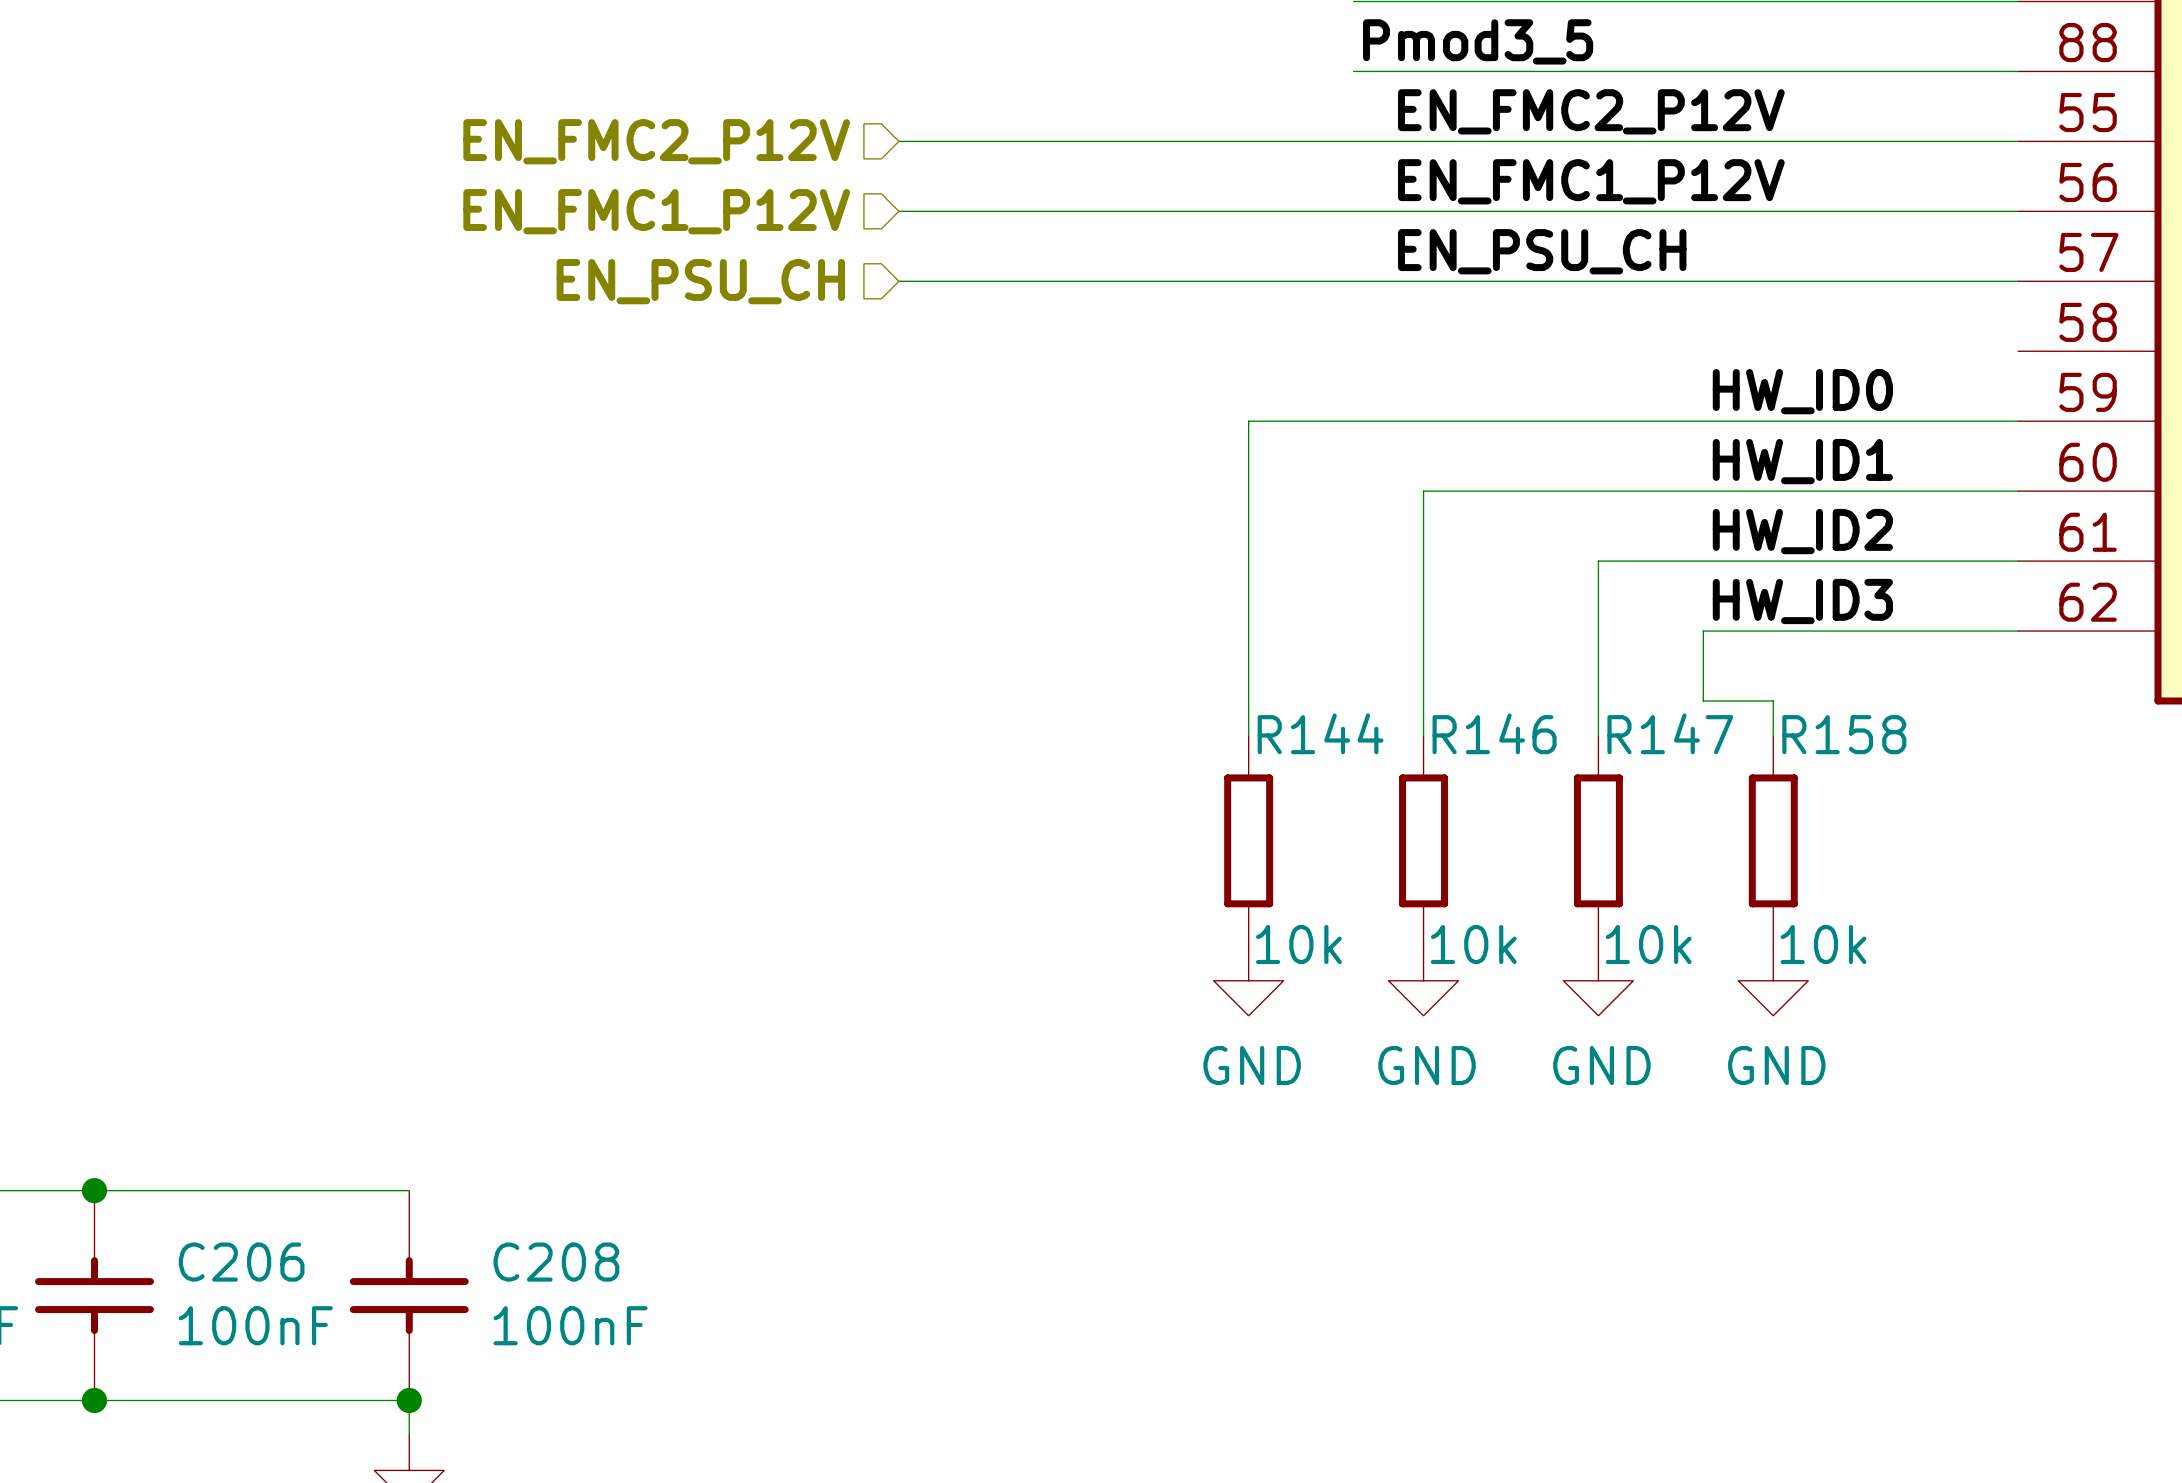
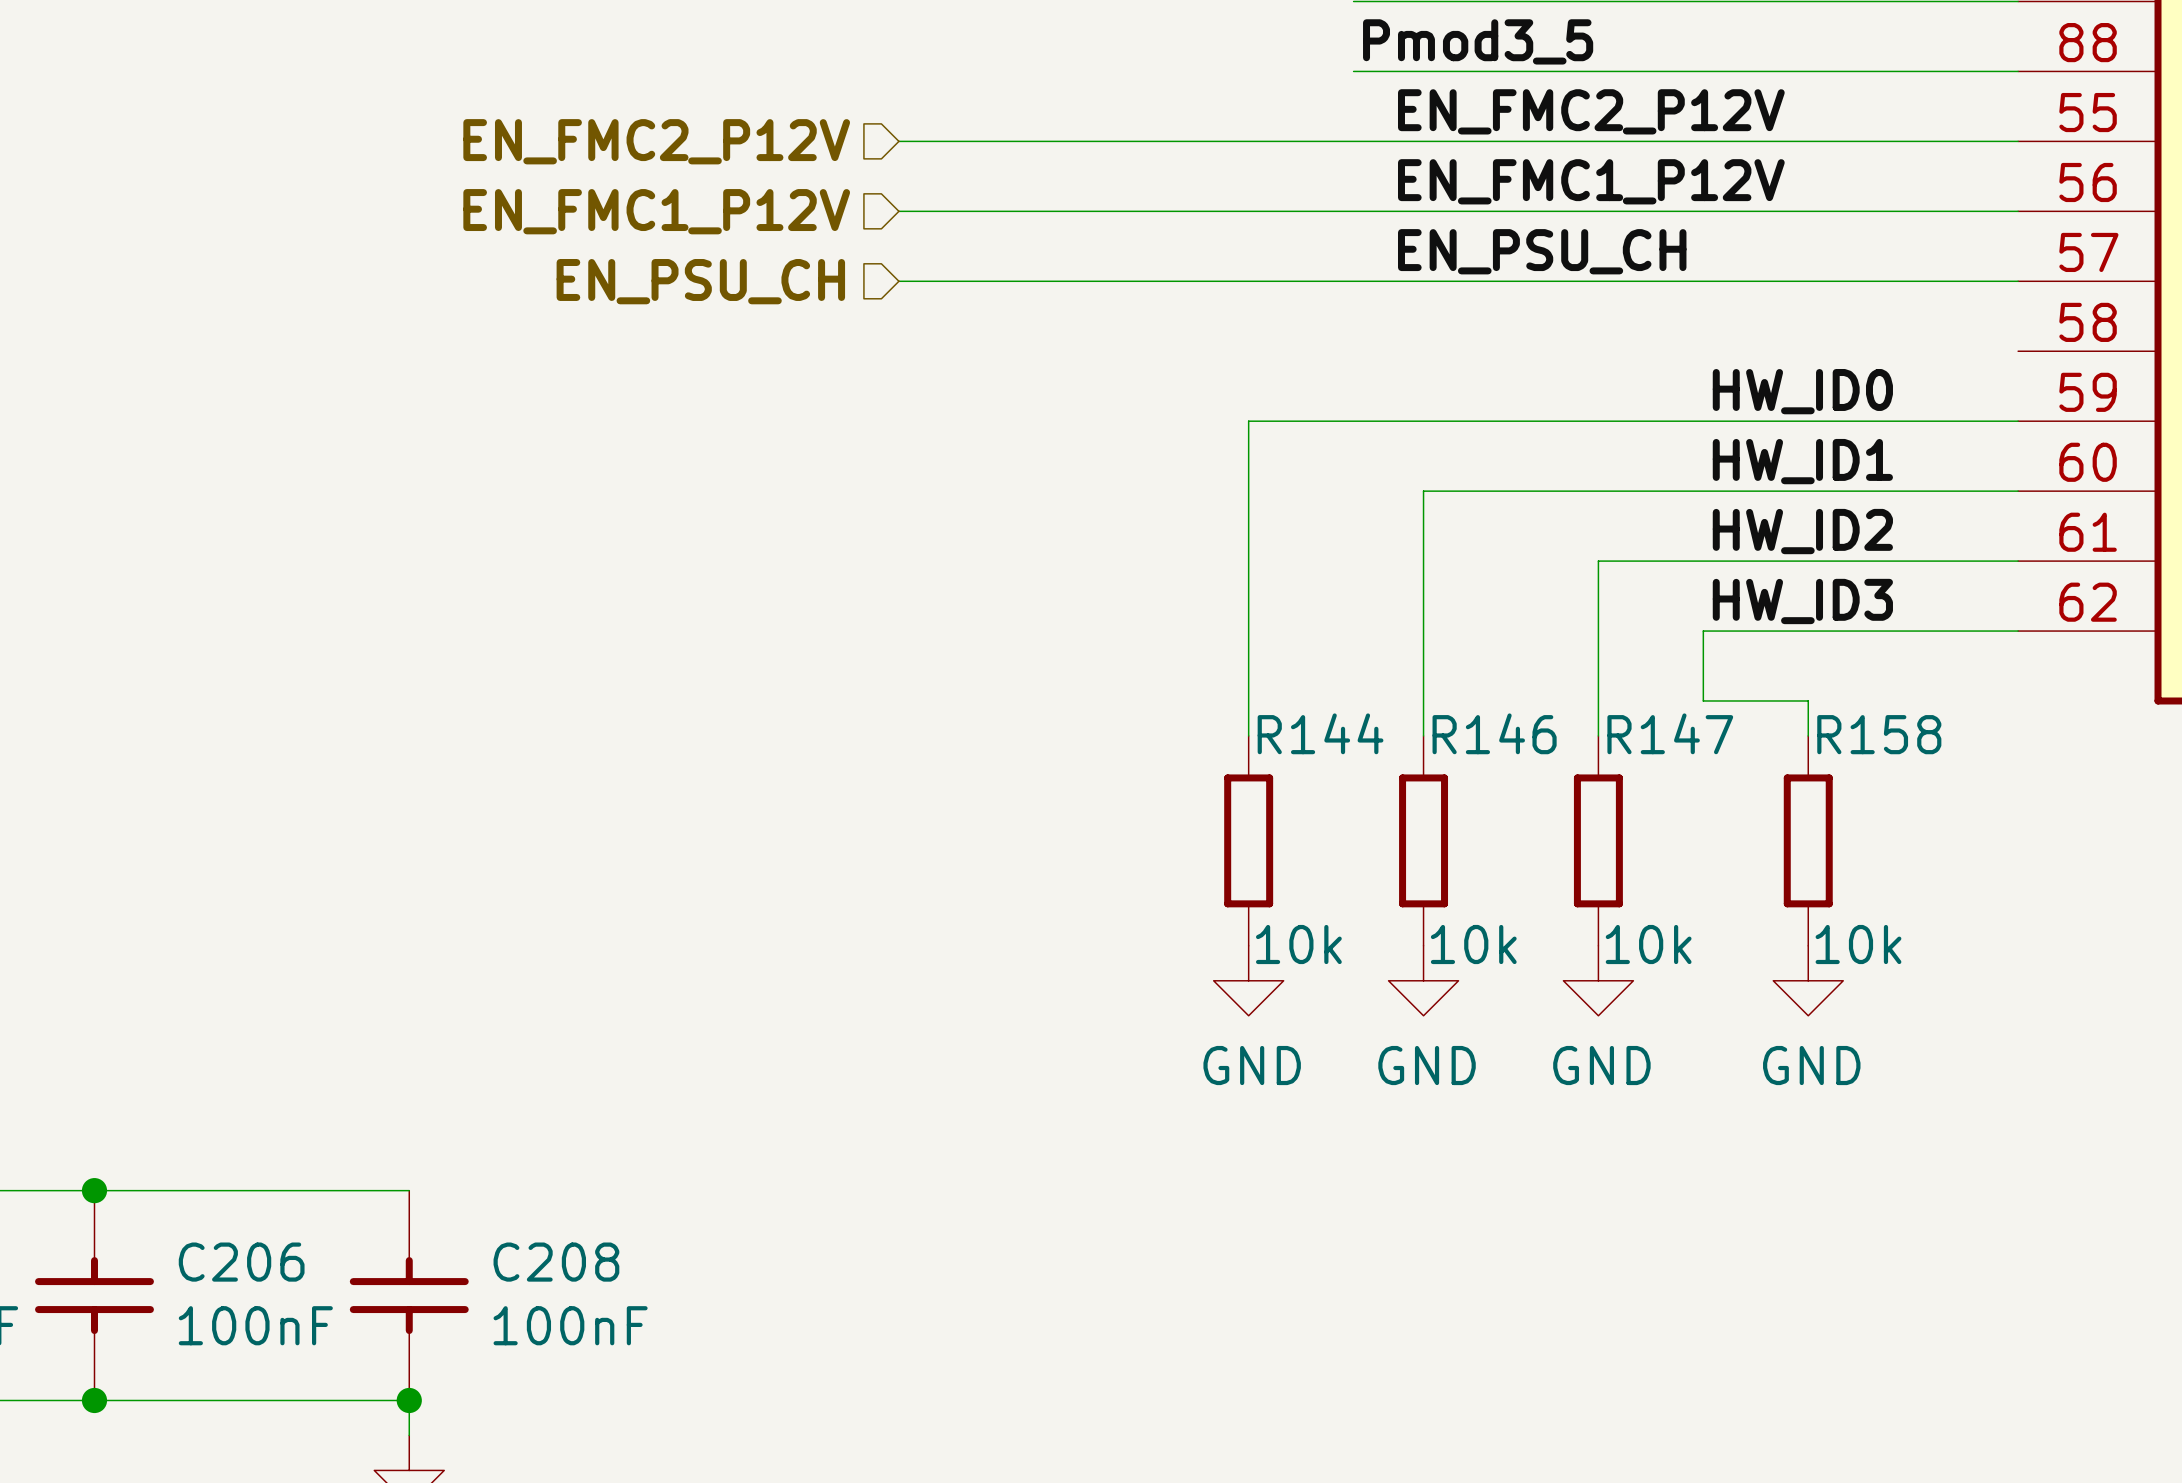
wire: (1773, 700) (1773, 735) -> (1773, 700) (1808, 700) (1808, 735)
R158 position: (1773, 840) -> (1808, 840)
power symbol position: GND (1773, 980) -> GND (1808, 980)

